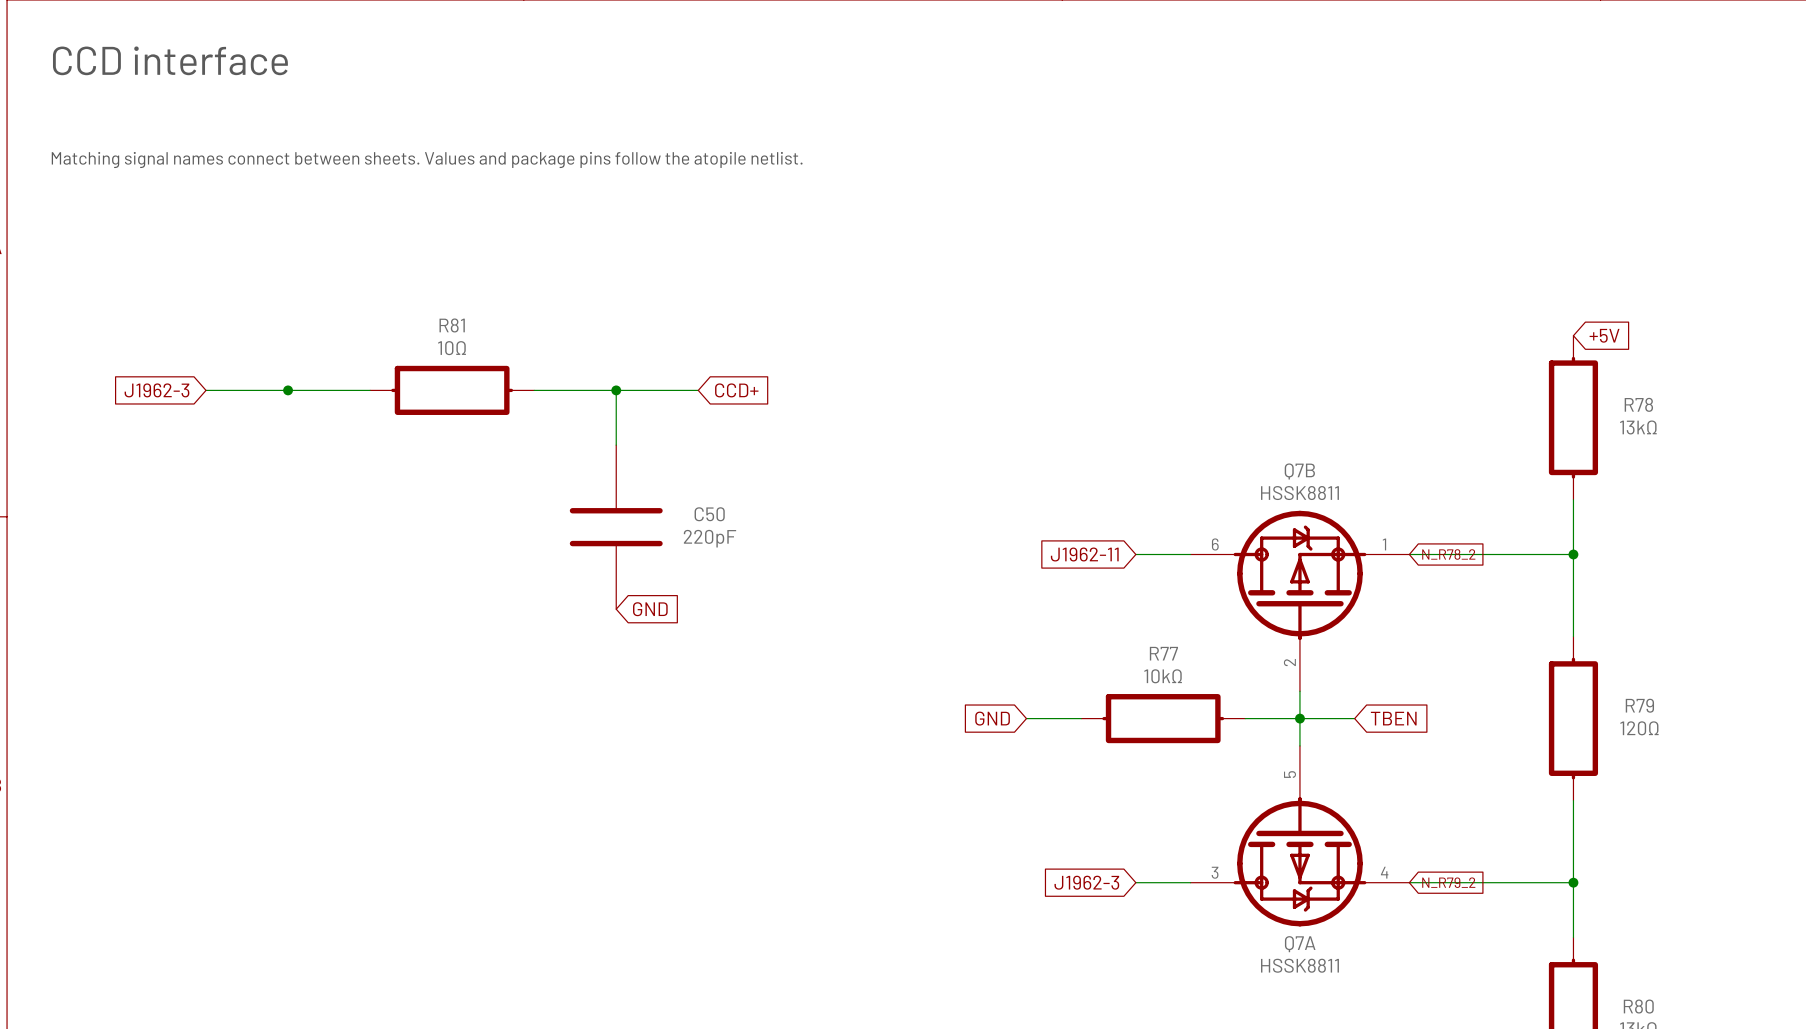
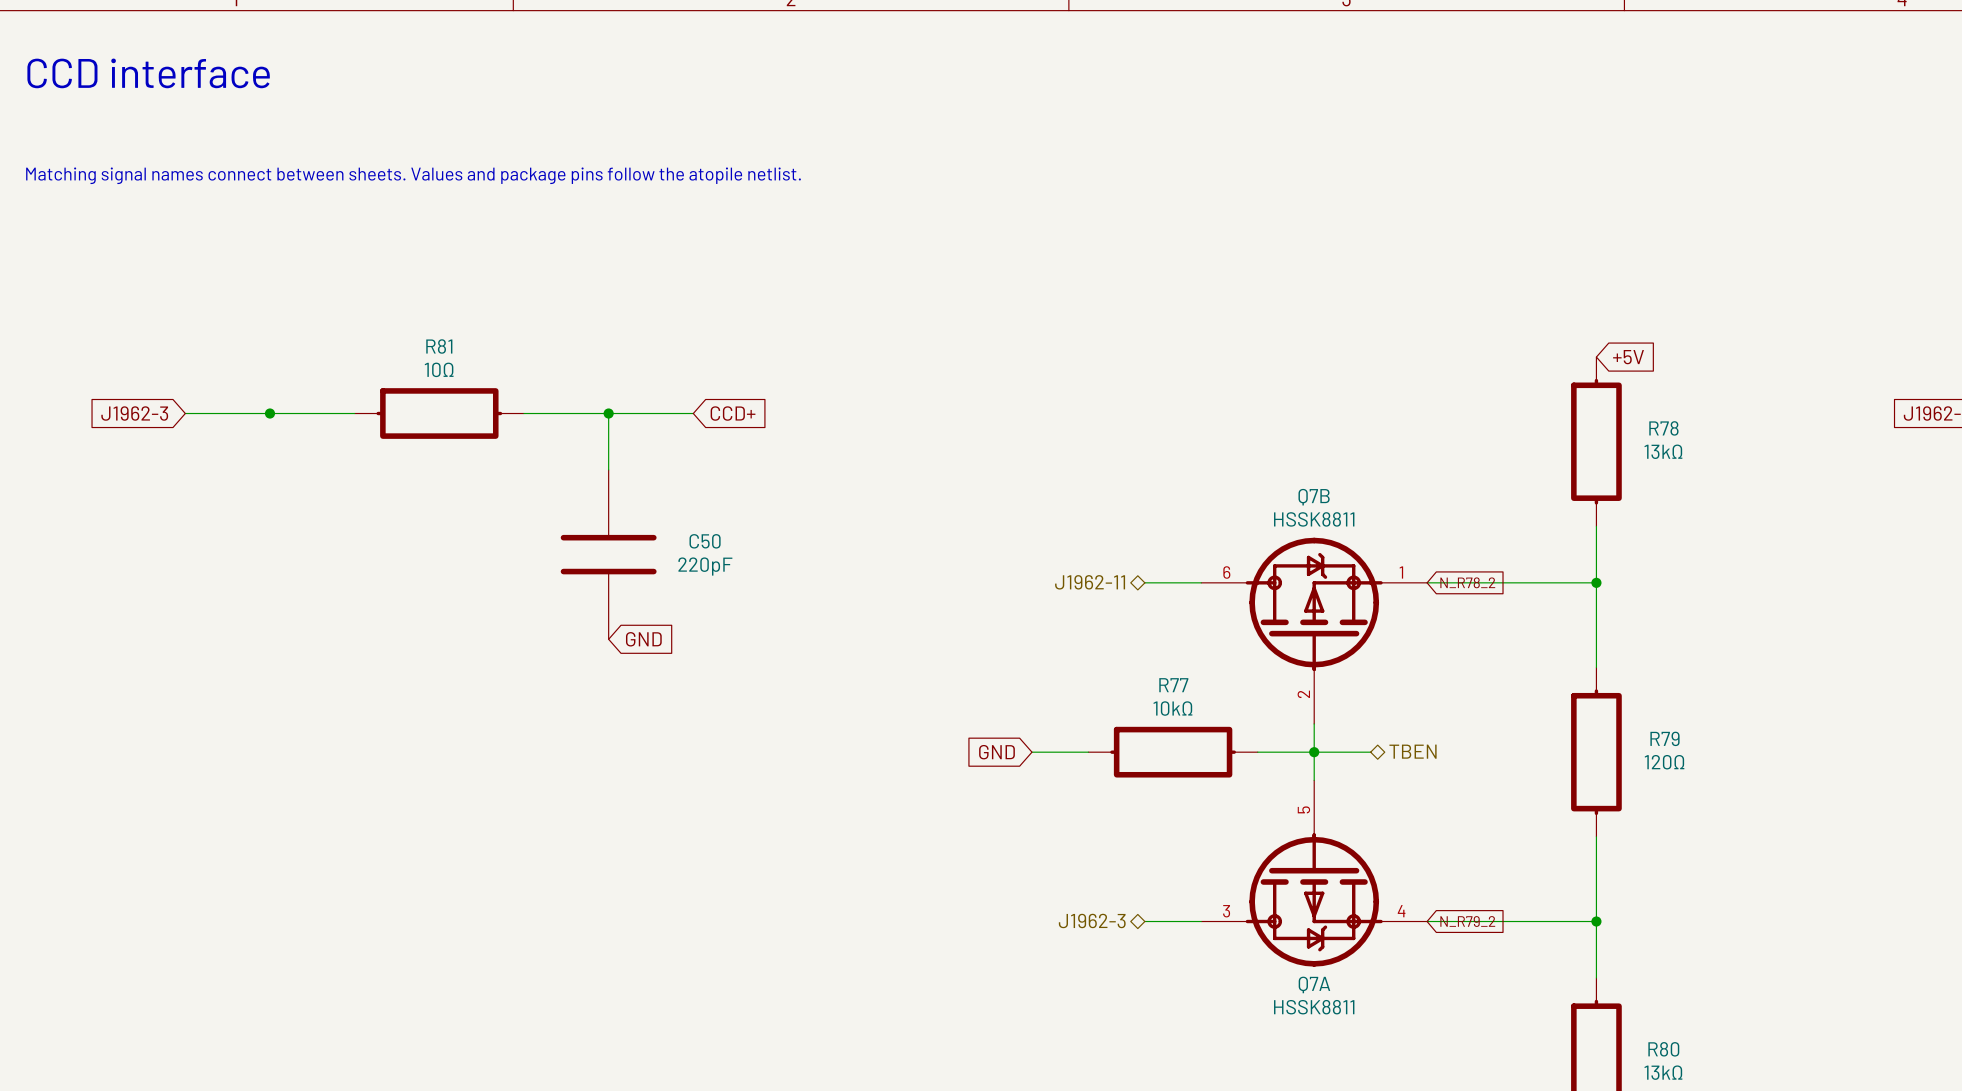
hierarchical label: none -> J1962-11 (1090, 582)
global label: J1962-11 (1084, 554) -> none
global label: TBEN (1393, 718) -> none
hierarchical label: none -> TBEN (1413, 751)
hierarchical label: none -> J1962-3 (1092, 920)
global label: J1962-3 (1086, 882) -> none

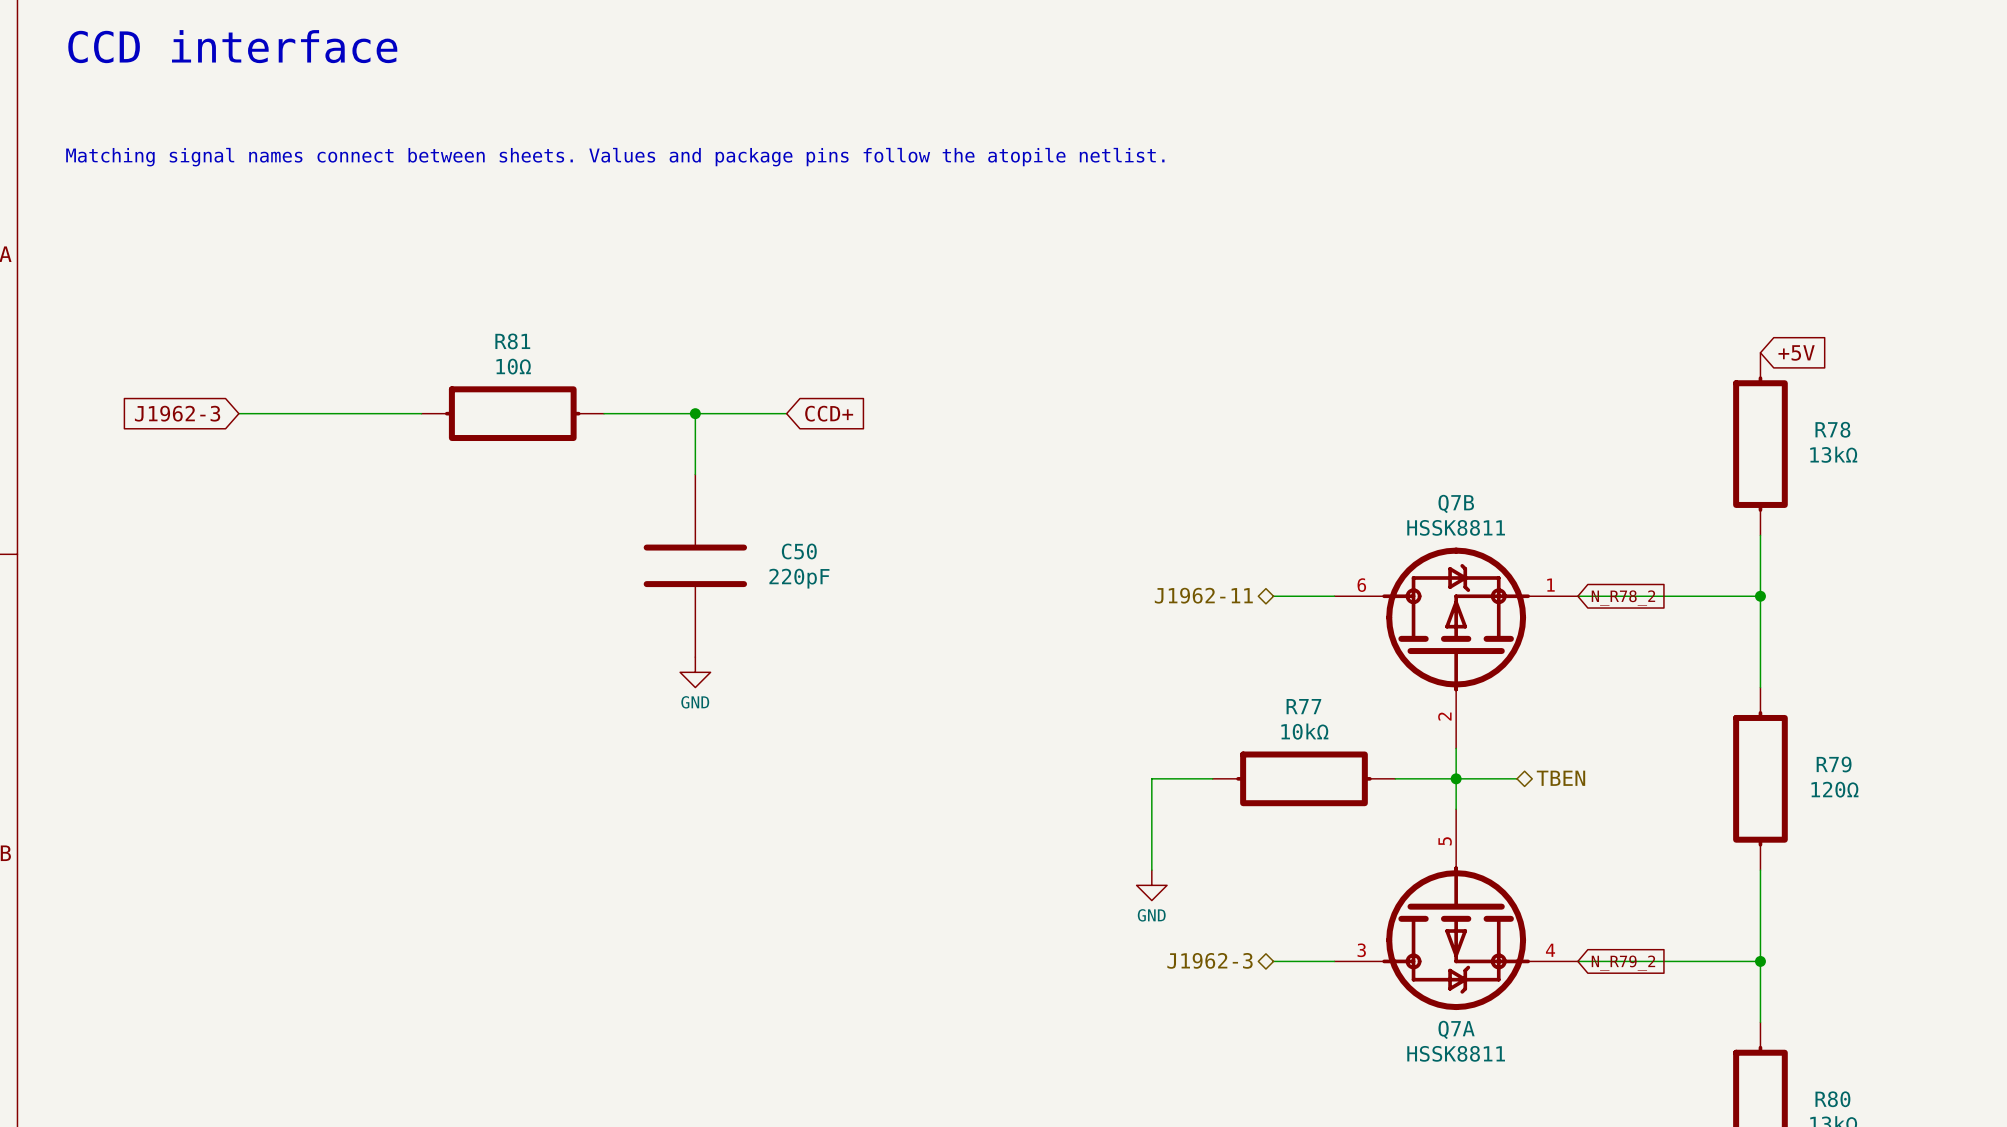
junction: (269, 413) -> none
global label: GND (643, 639) -> none
power symbol: none -> GND (695, 672)
global label: GND (996, 752) -> none
wire: none -> (1151, 778) (1151, 870)
power symbol: none -> GND (1151, 885)

